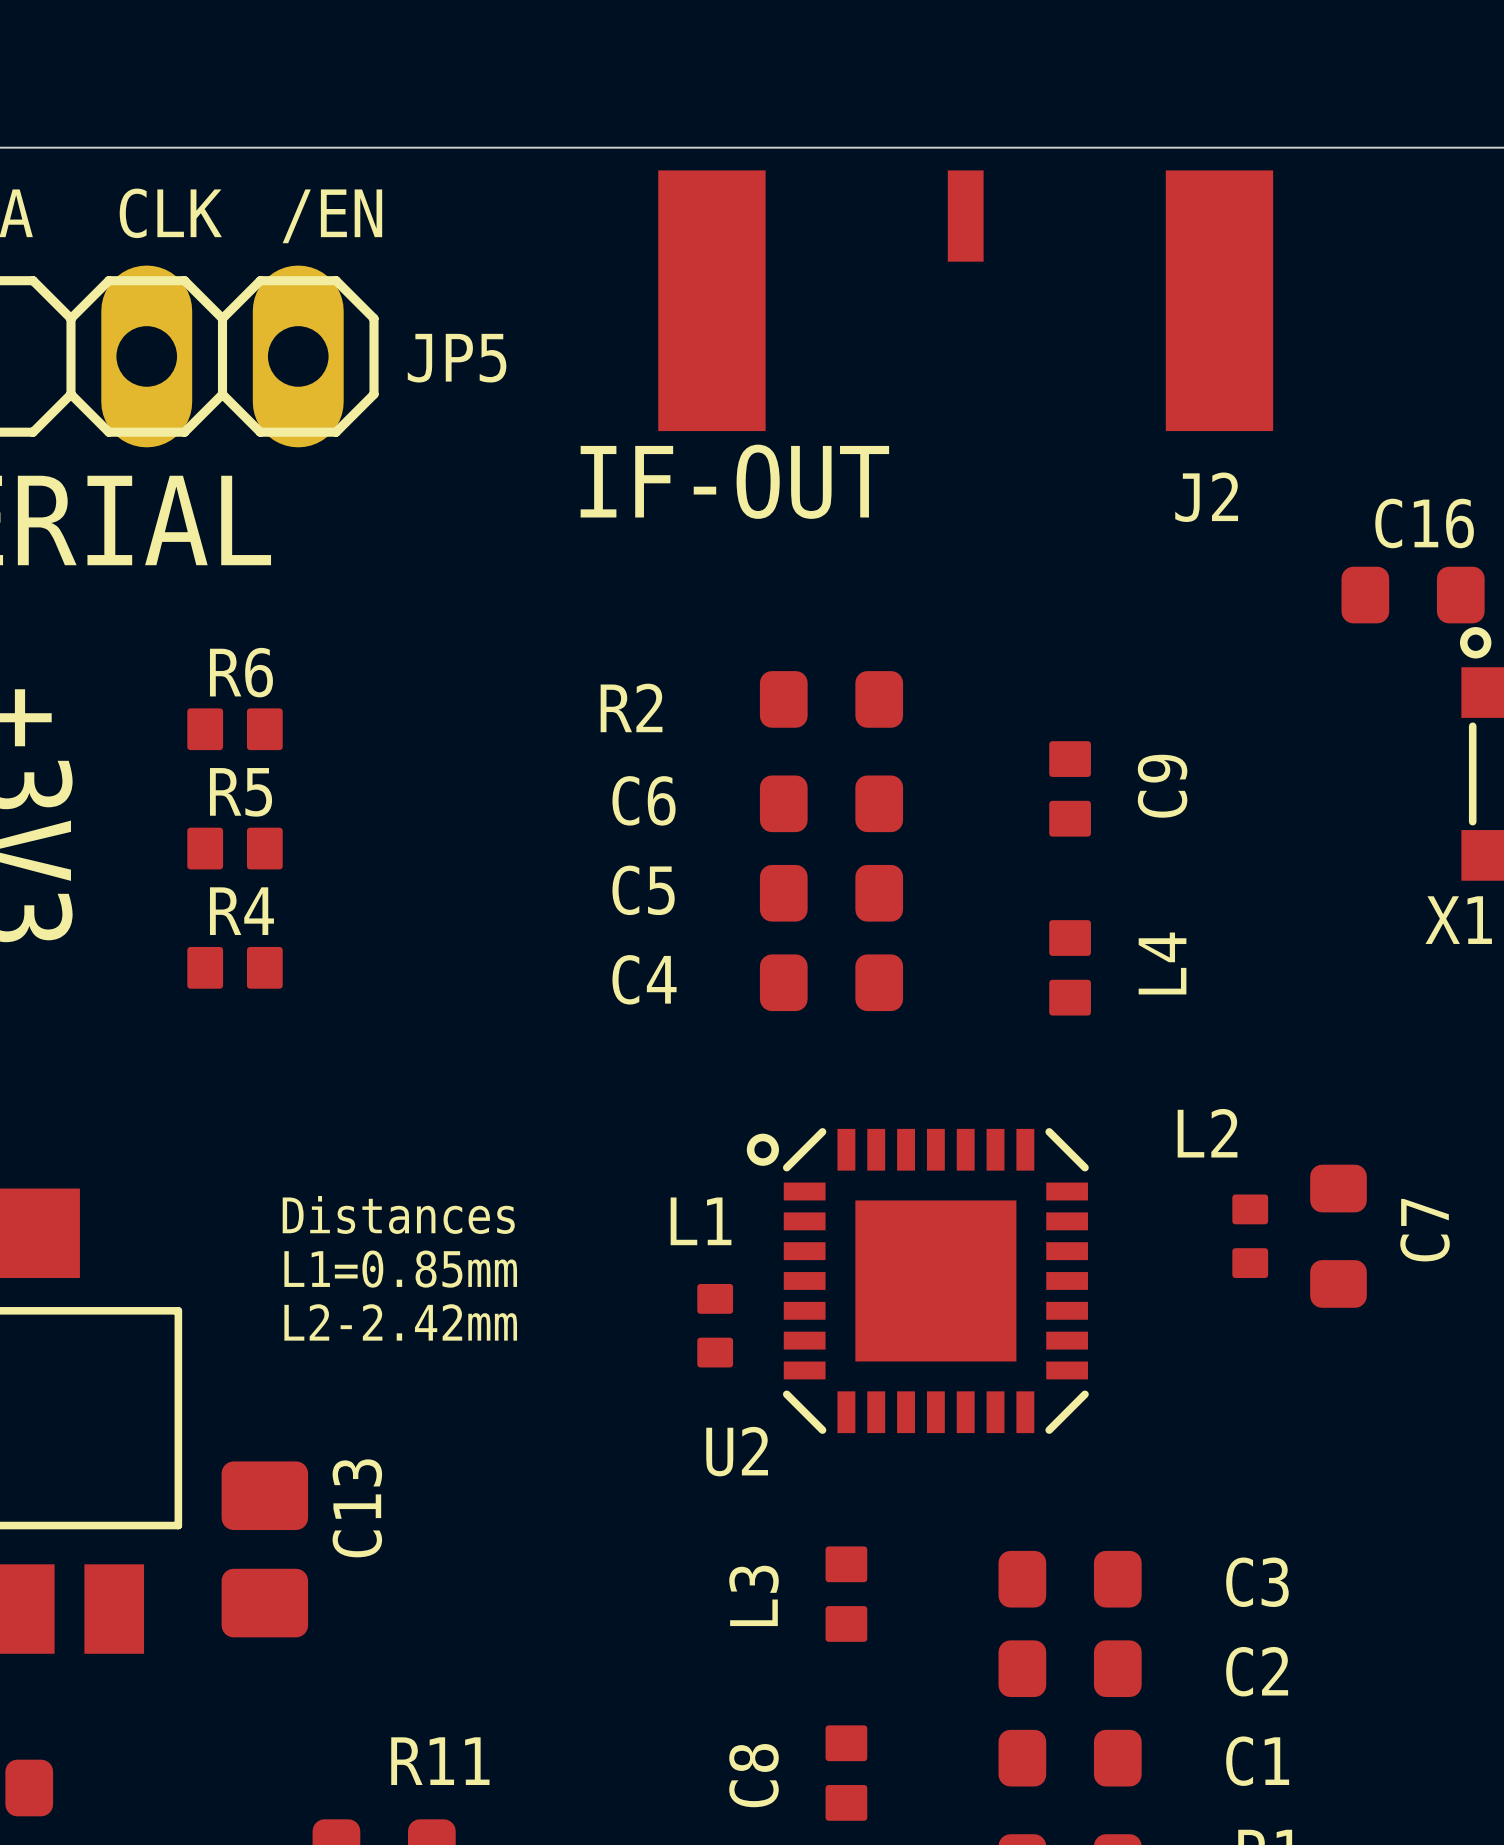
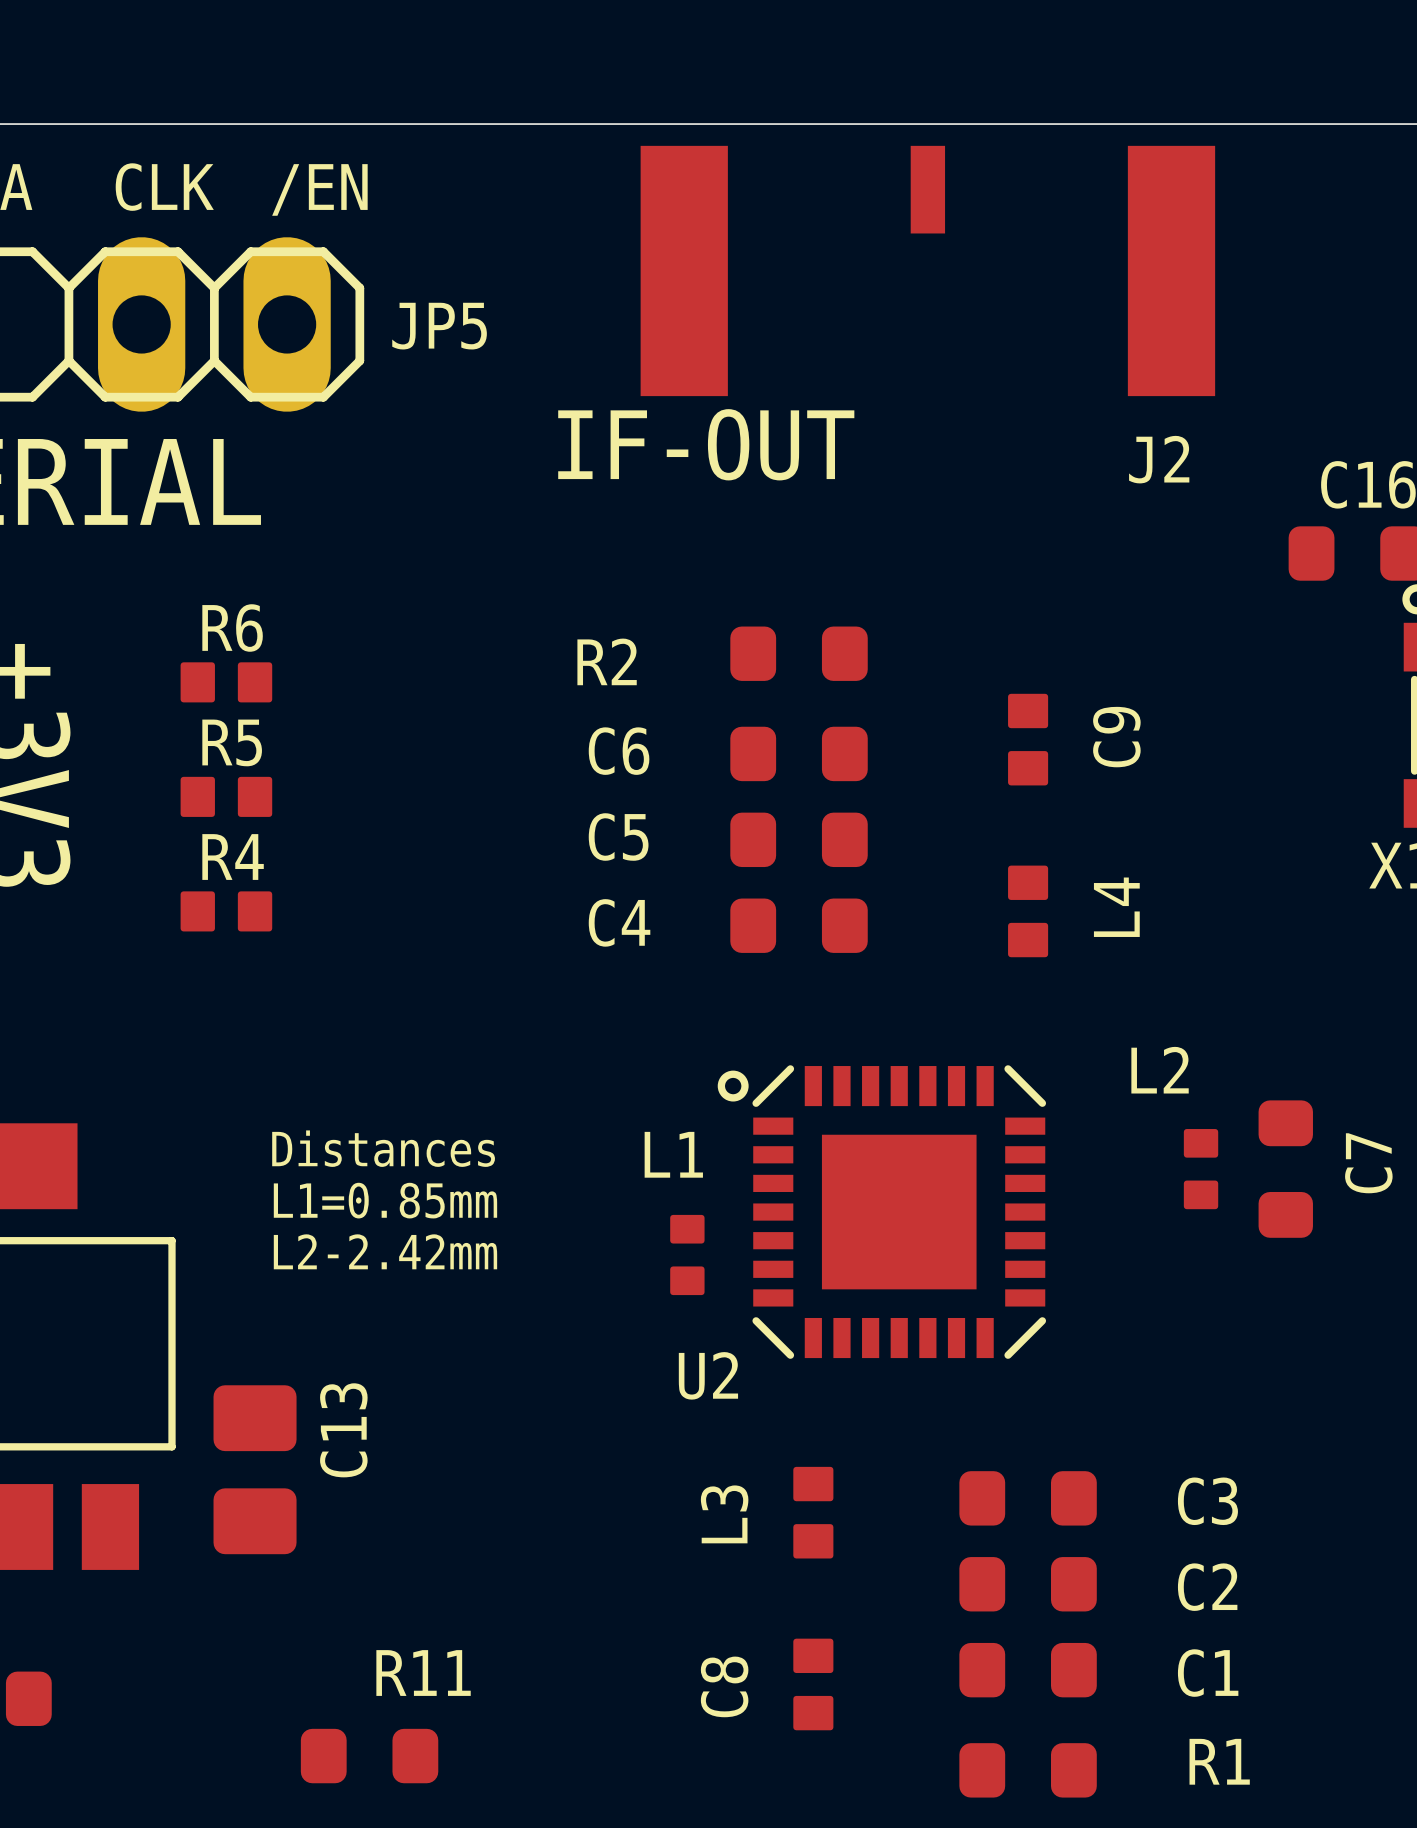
J2 footprint: [658, 170, 1274, 432] -> [640, 145, 1216, 397]

